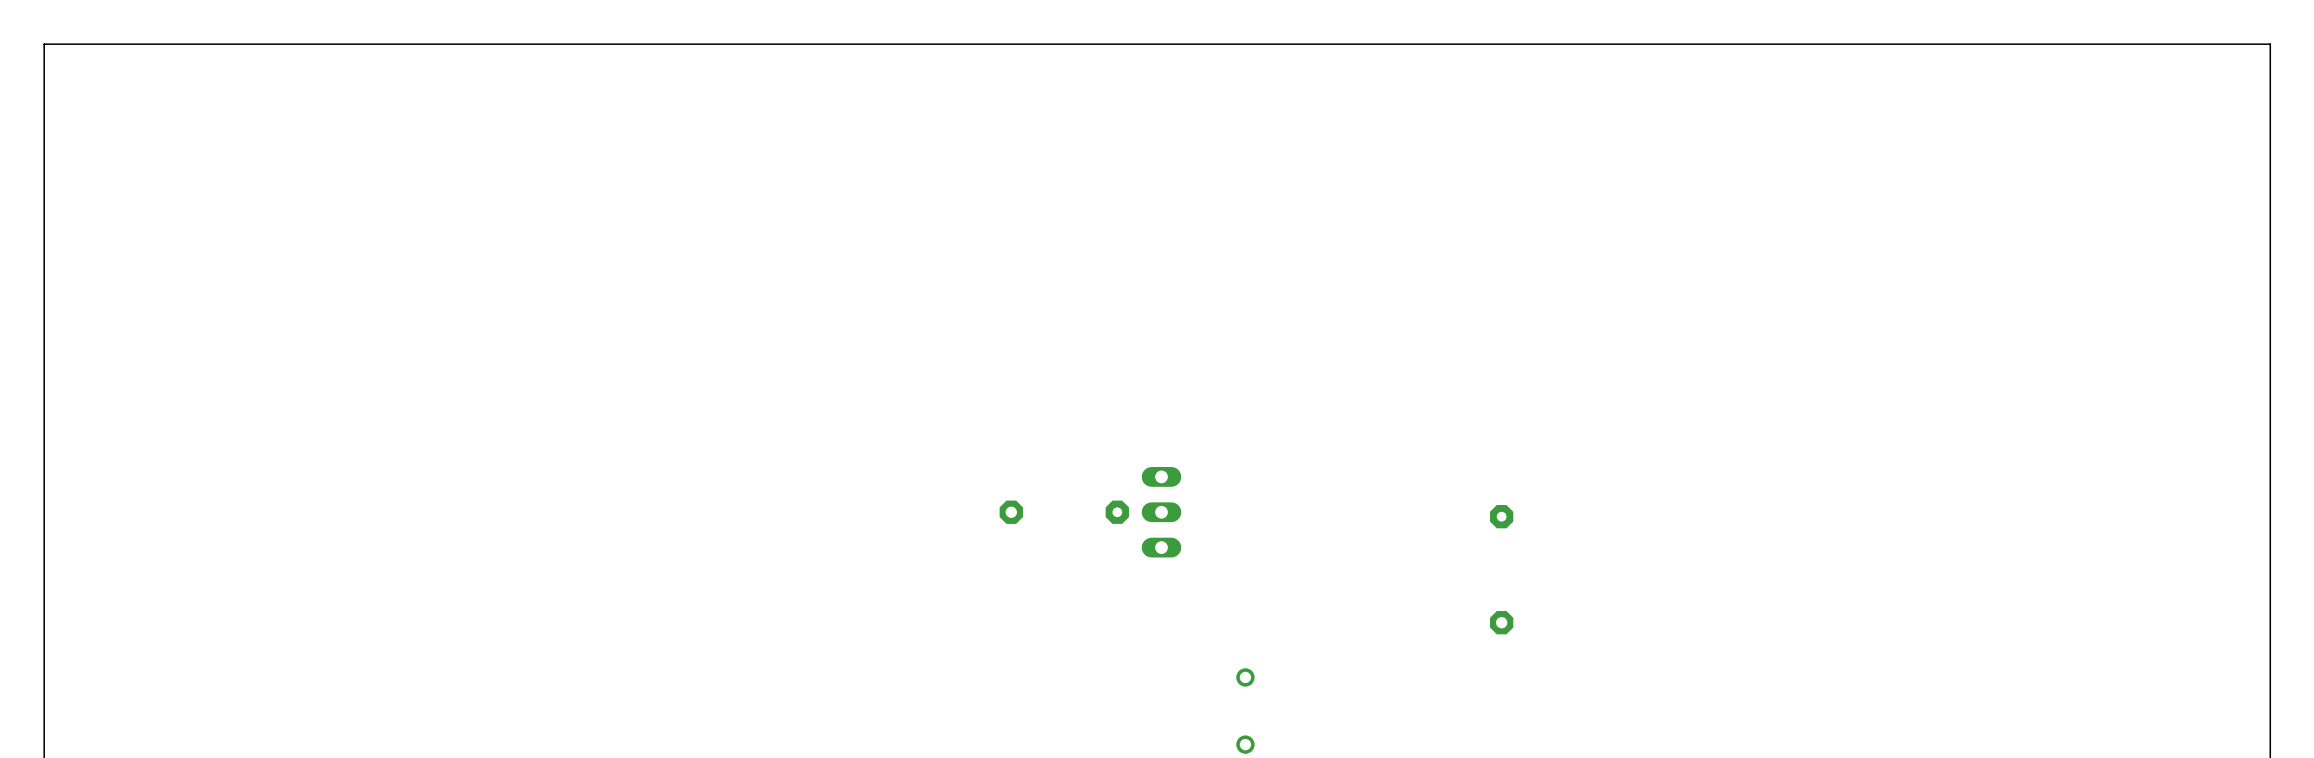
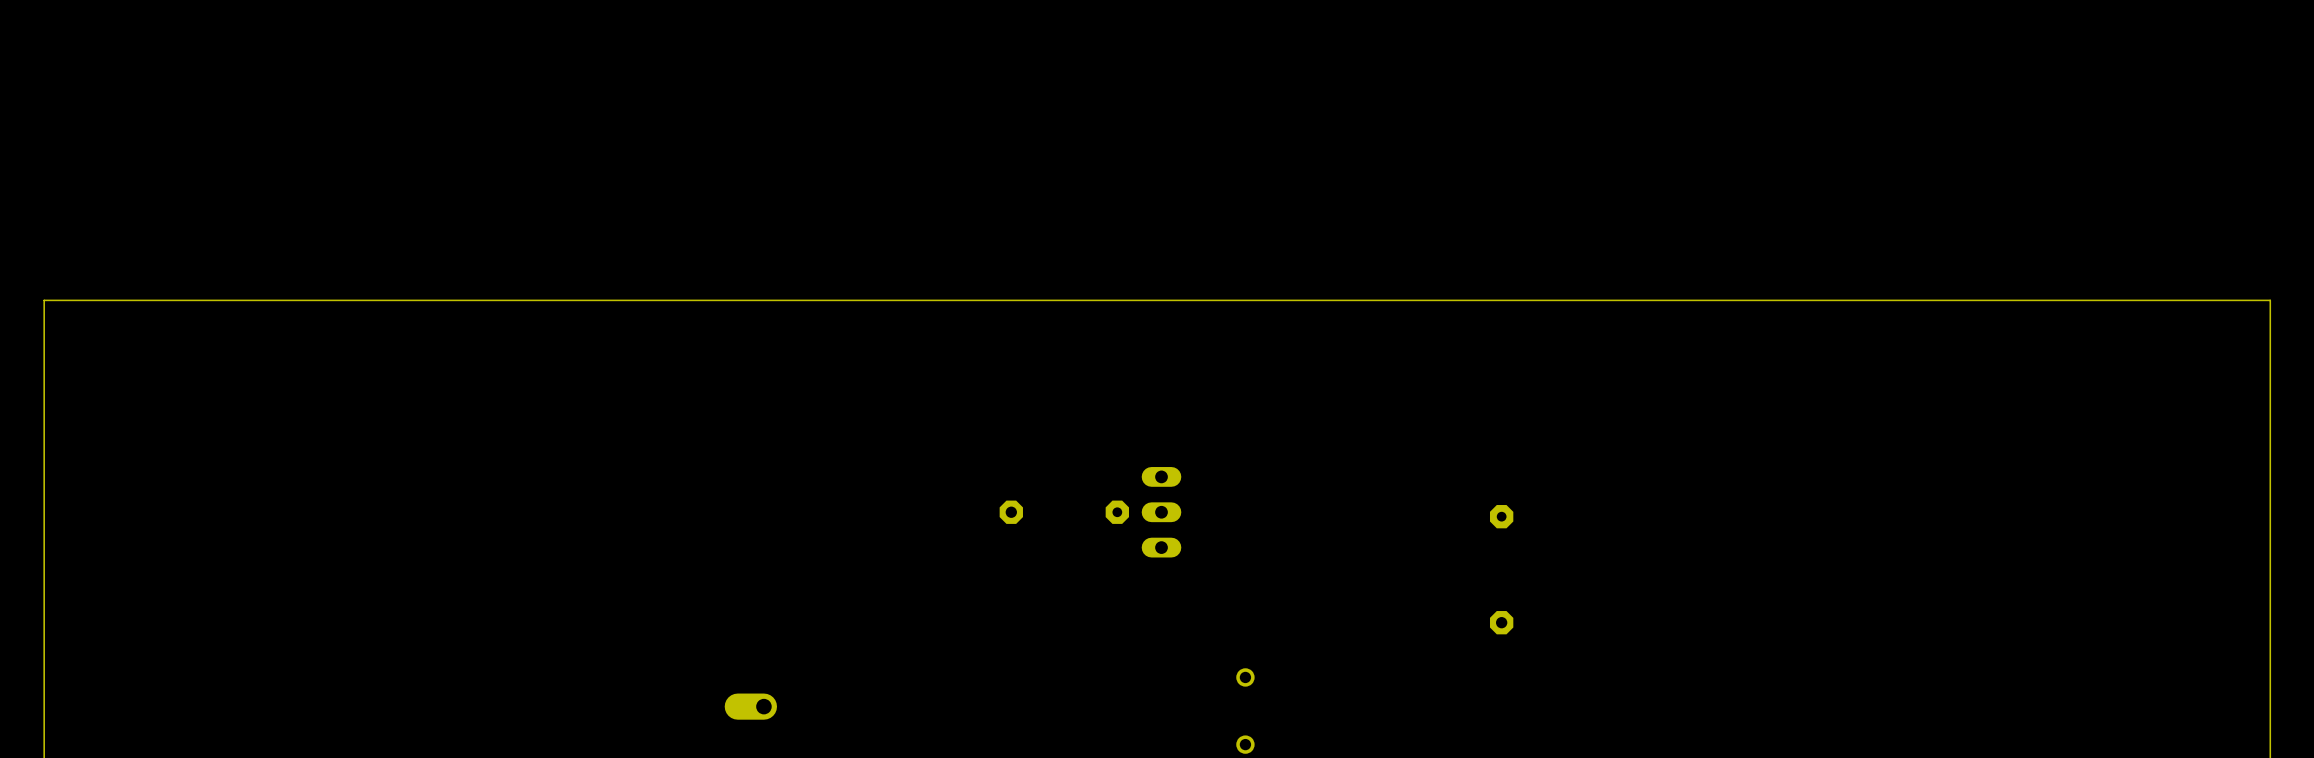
board edge: (2270, 300) (2270, 44) (44, 44) (44, 300) -> (2270, 300) (44, 300)
part: none -> (750, 706)

